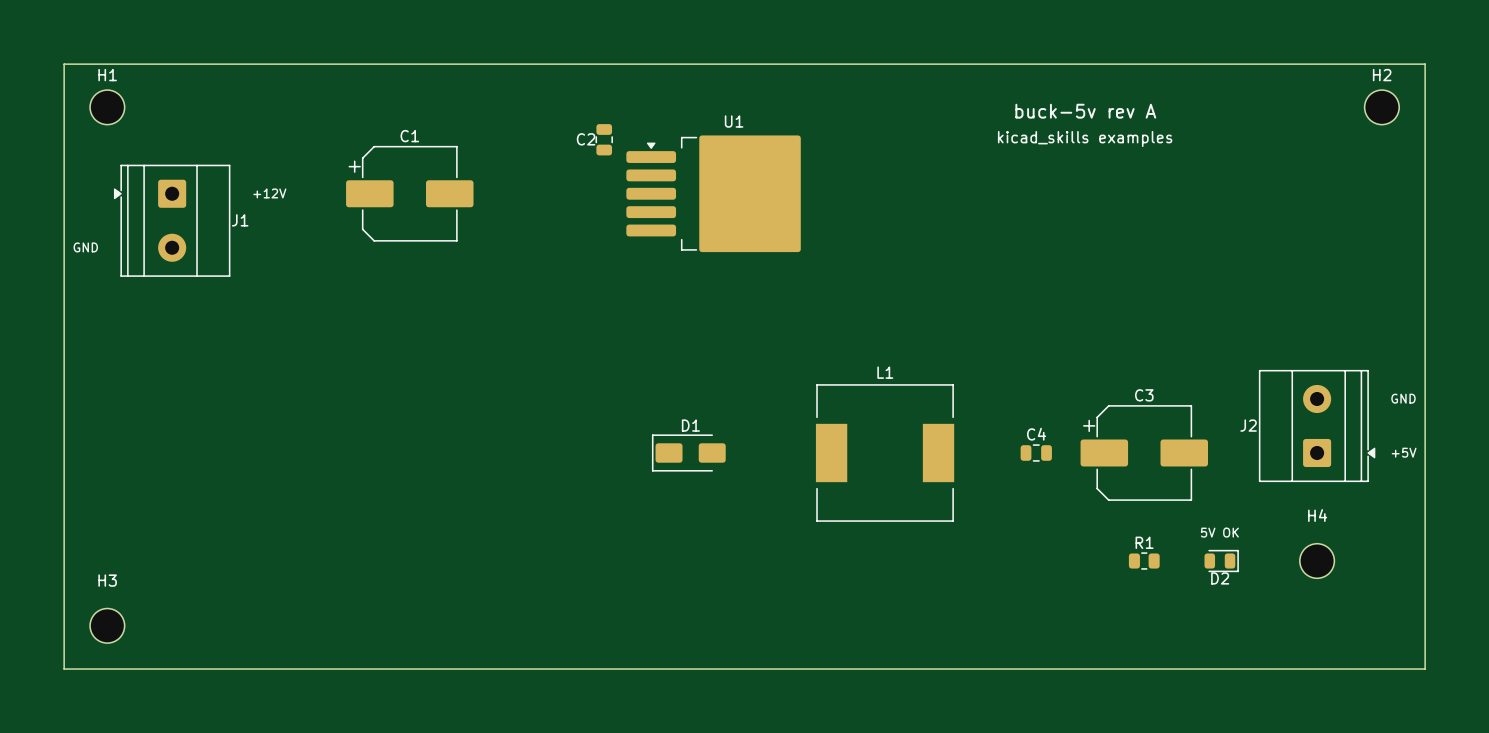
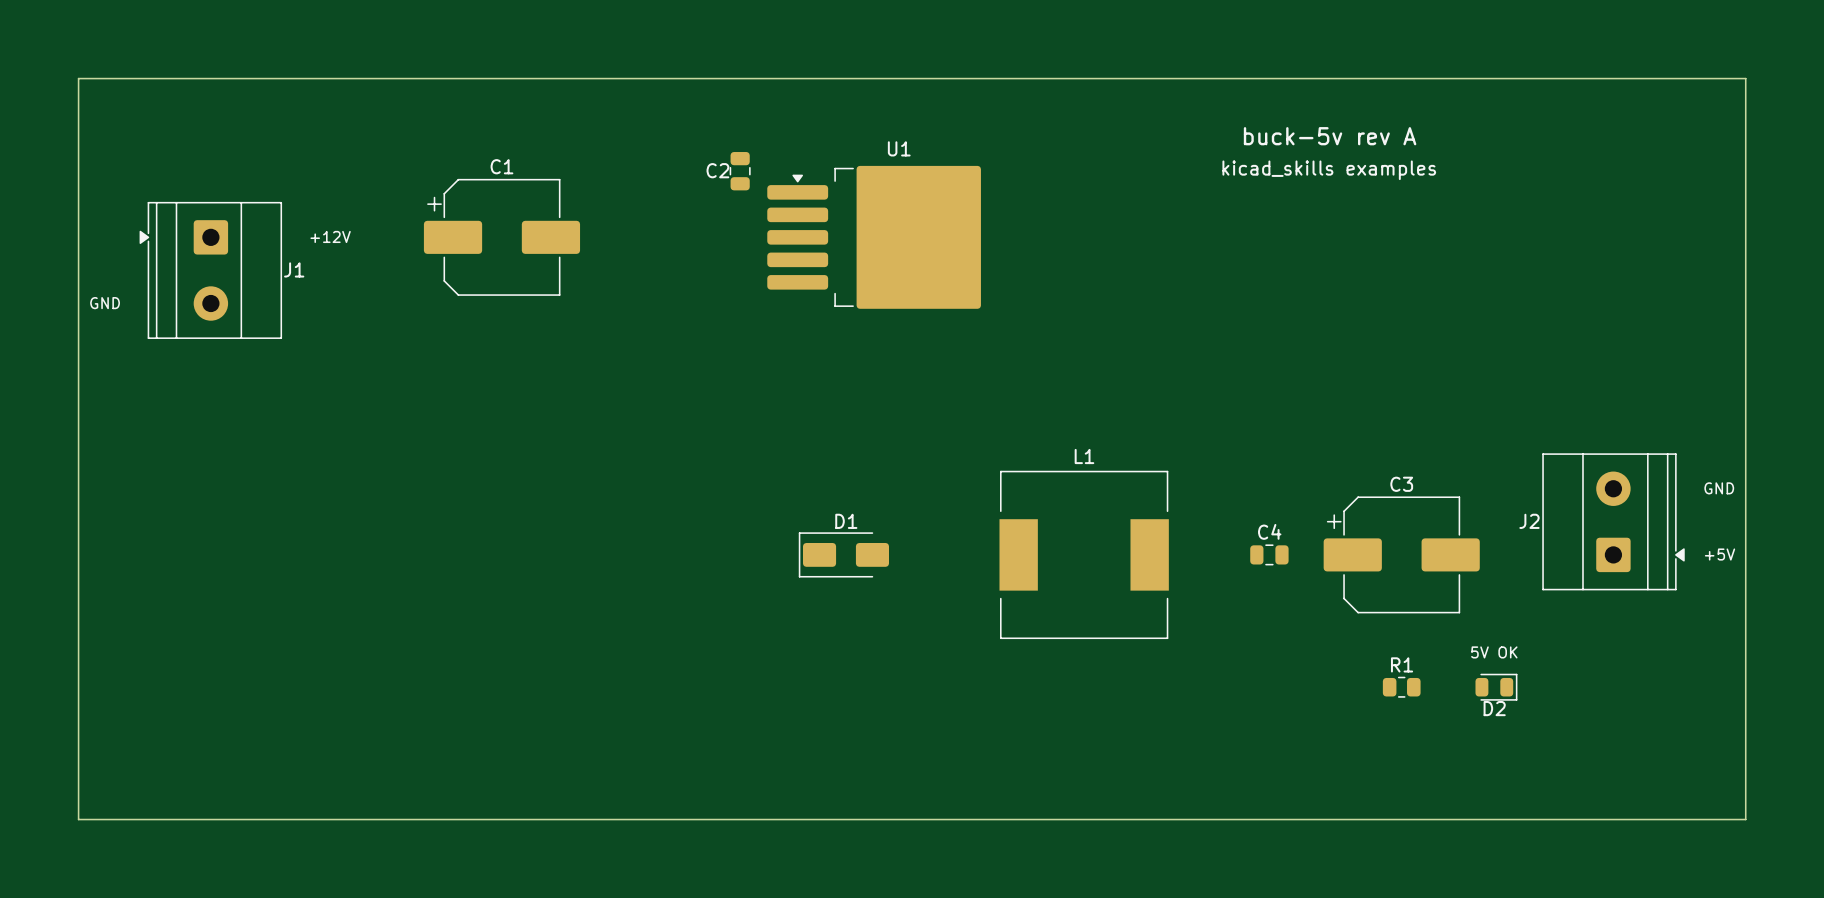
H1: (107, 107) -> none
H2: (1381, 107) -> none
H4: (1317, 561) -> none
H3: (107, 625) -> none

